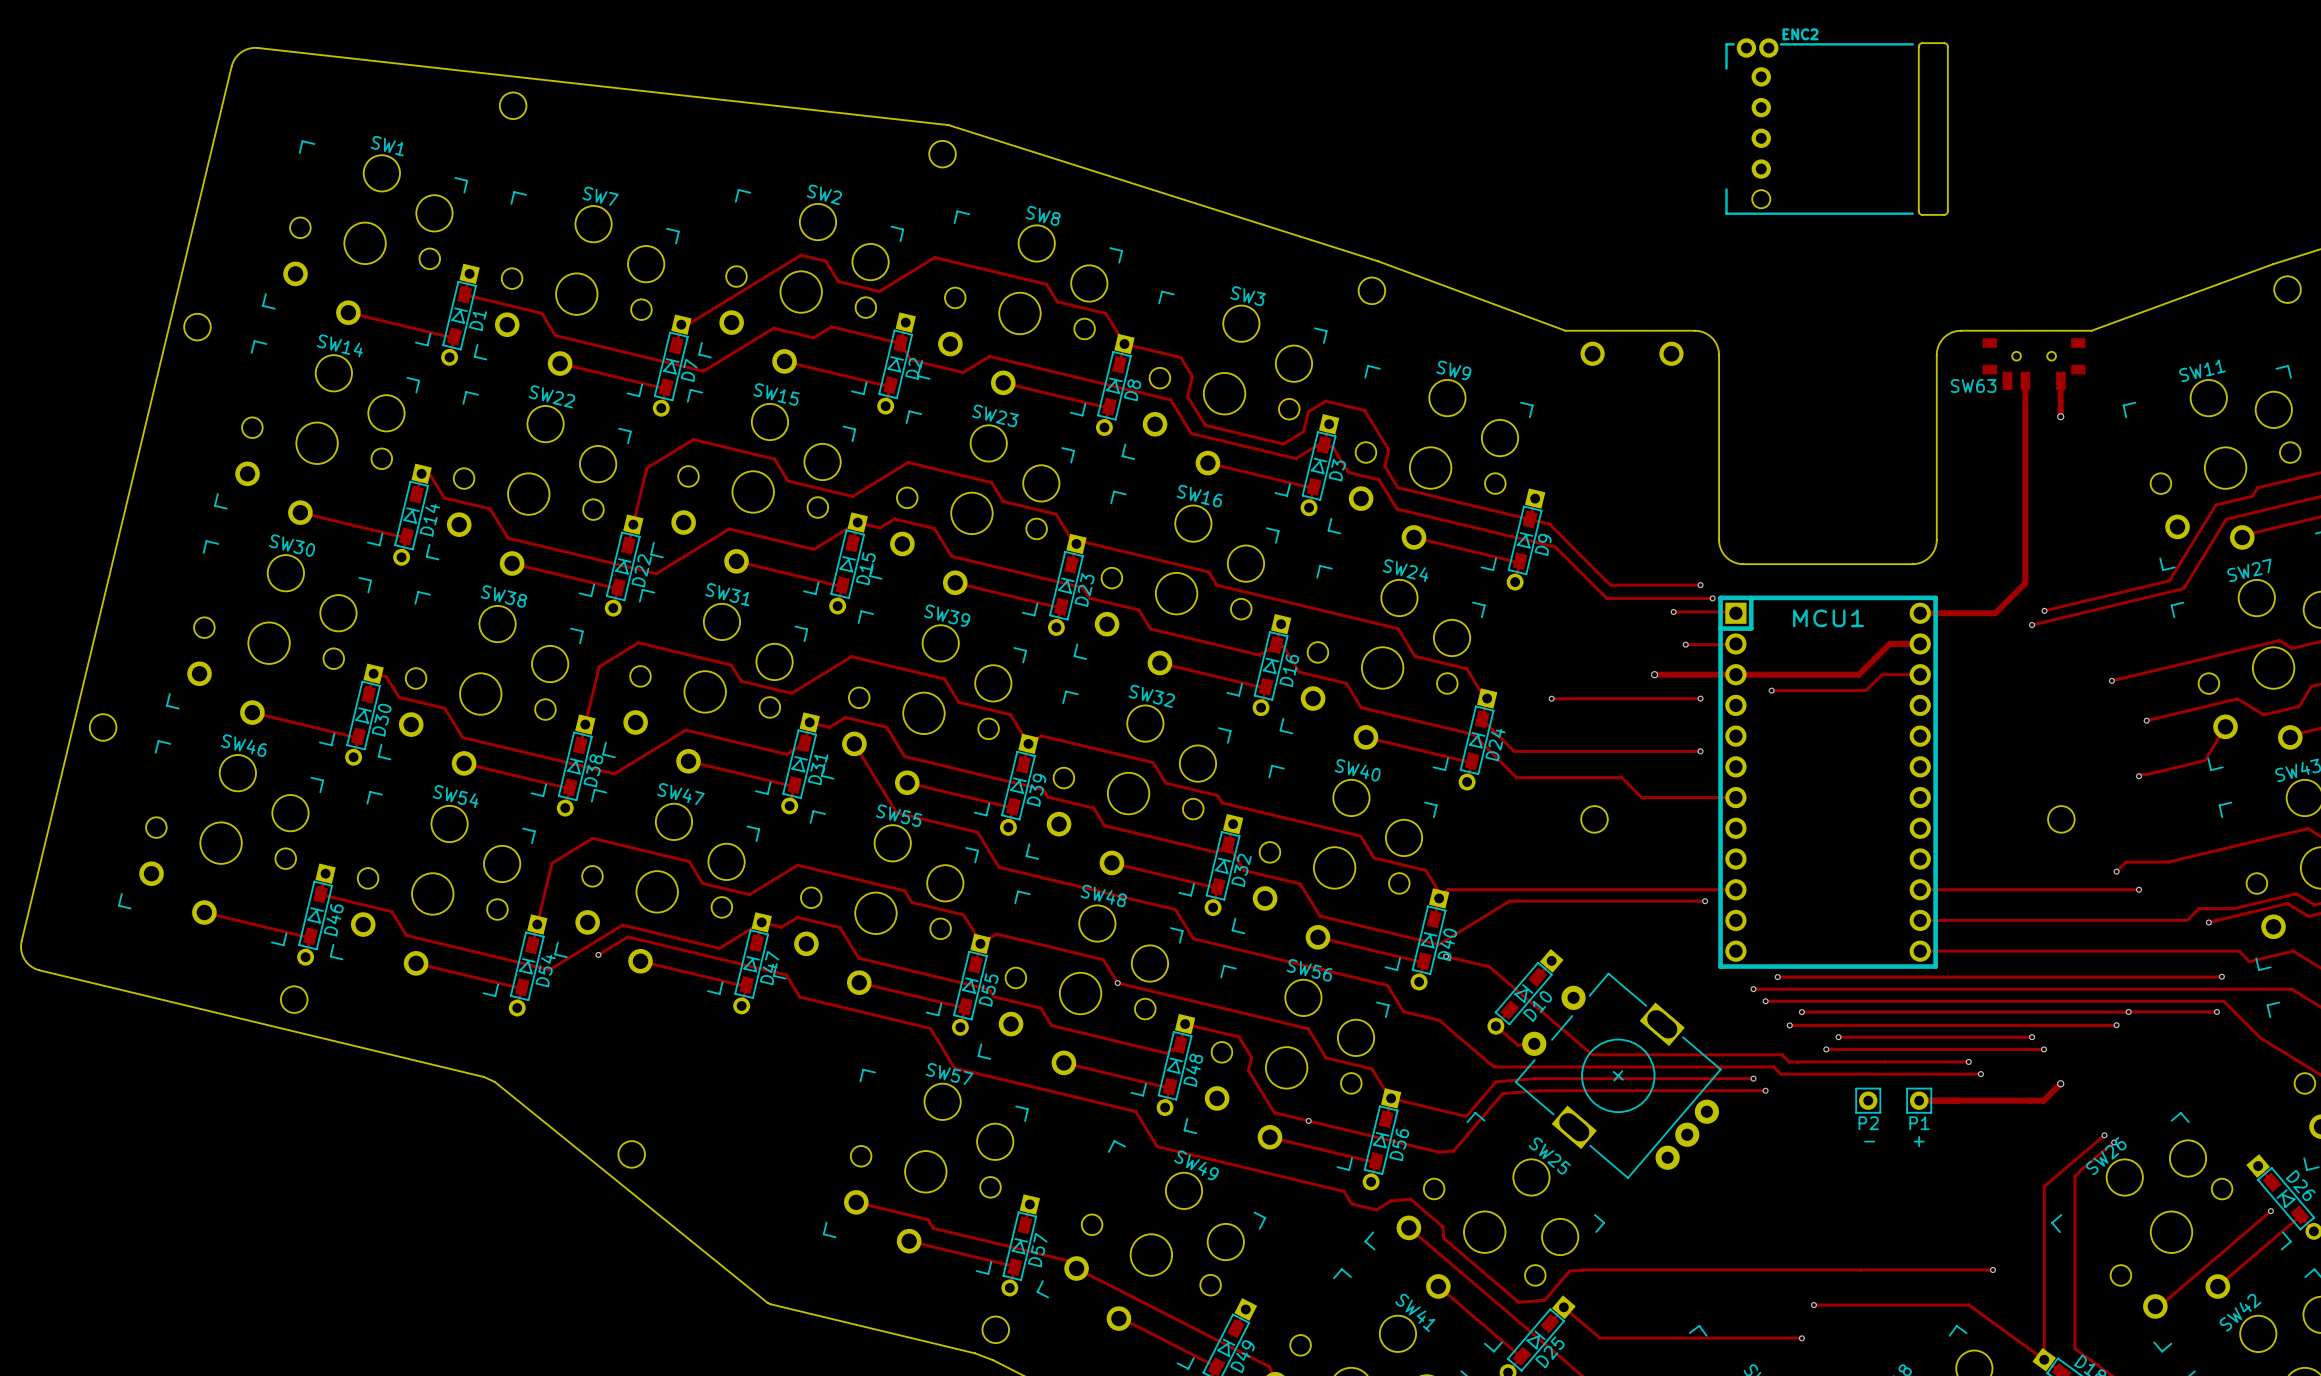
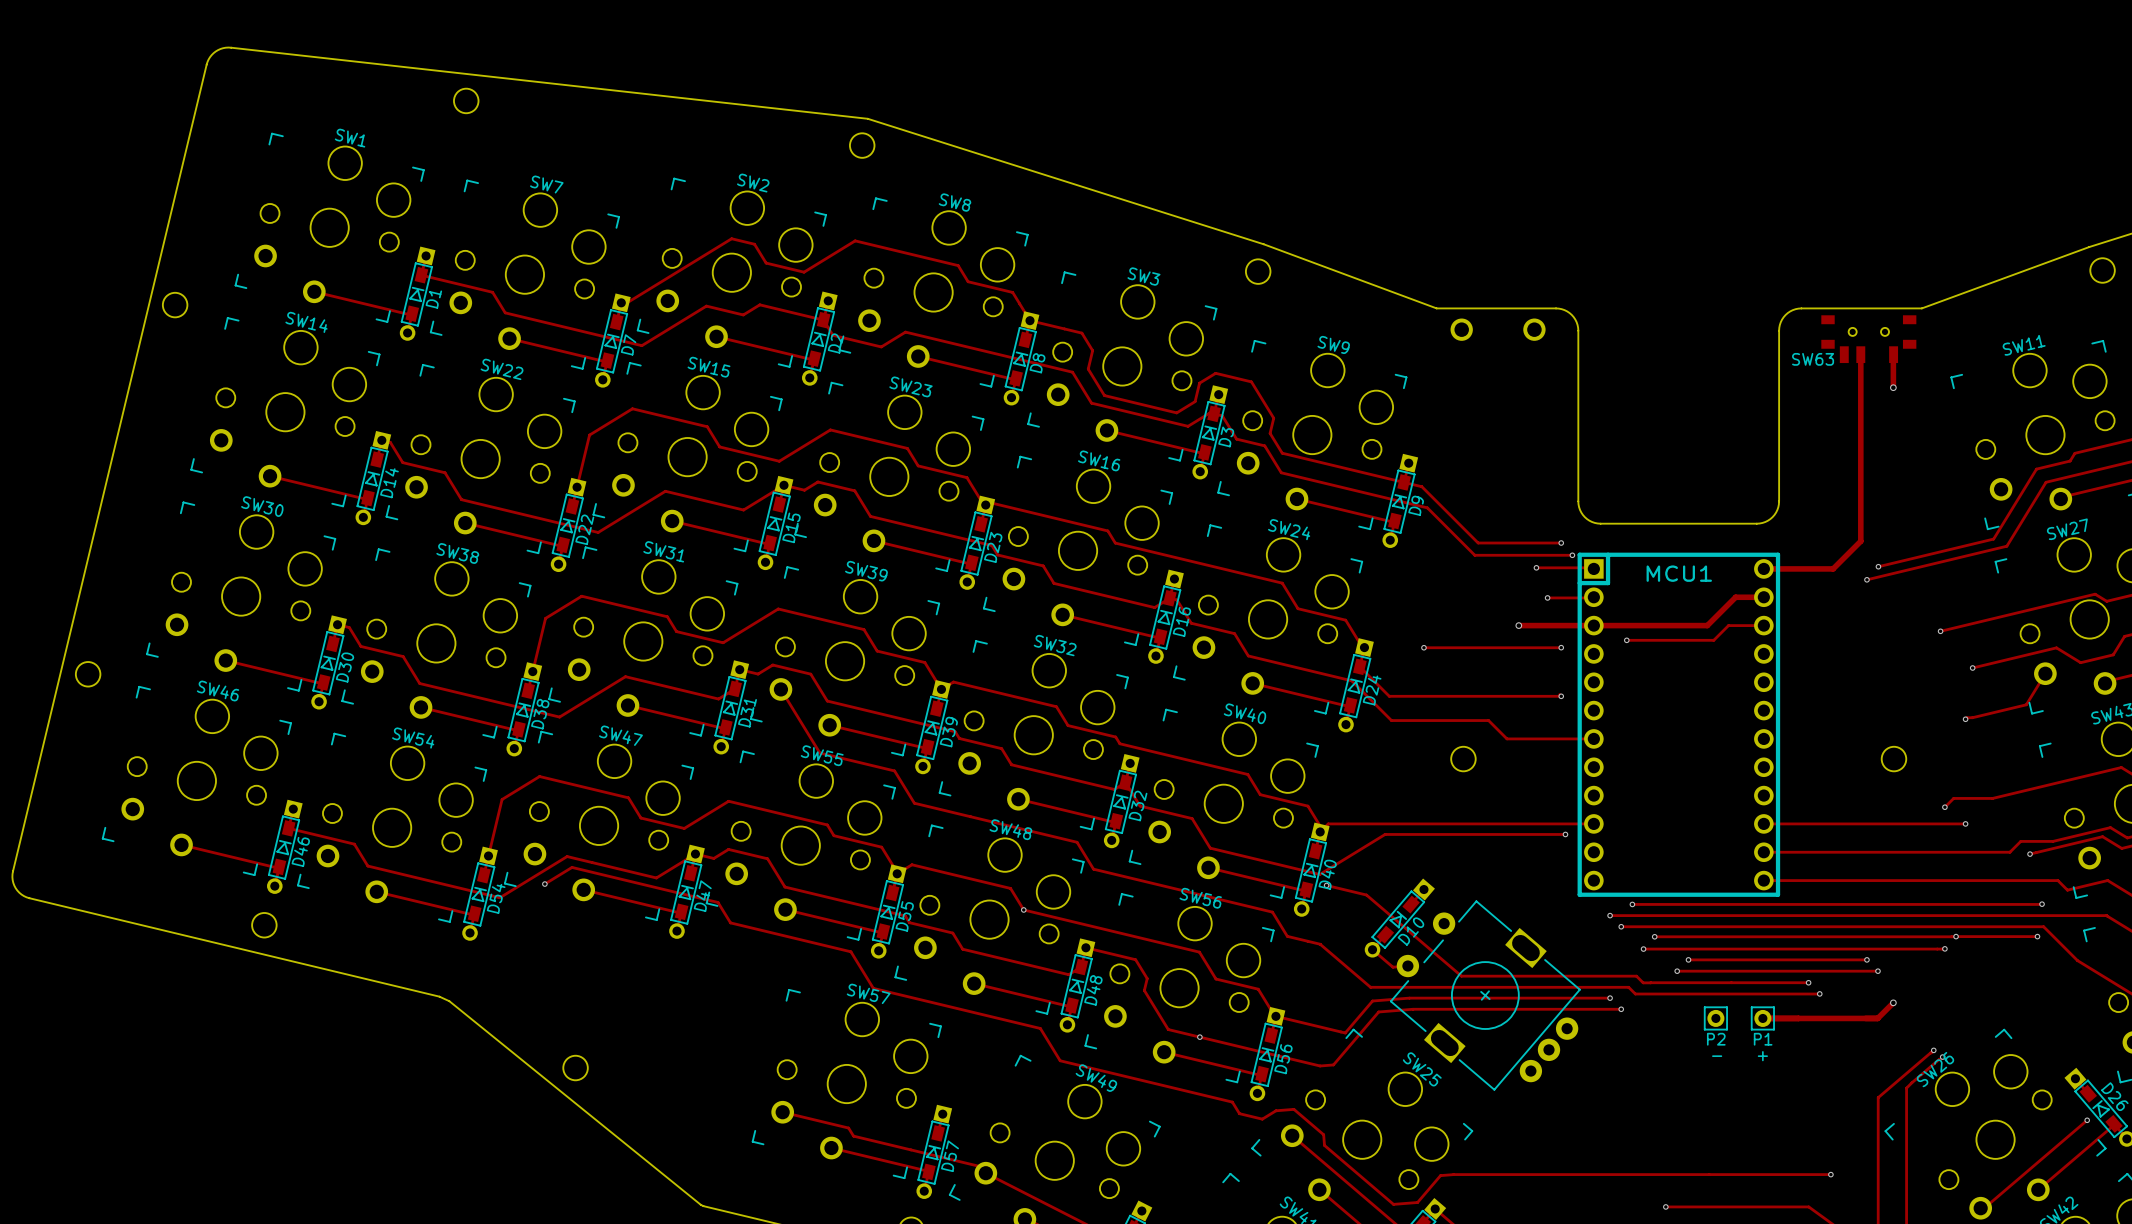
ENC2: (1836, 126) -> none

